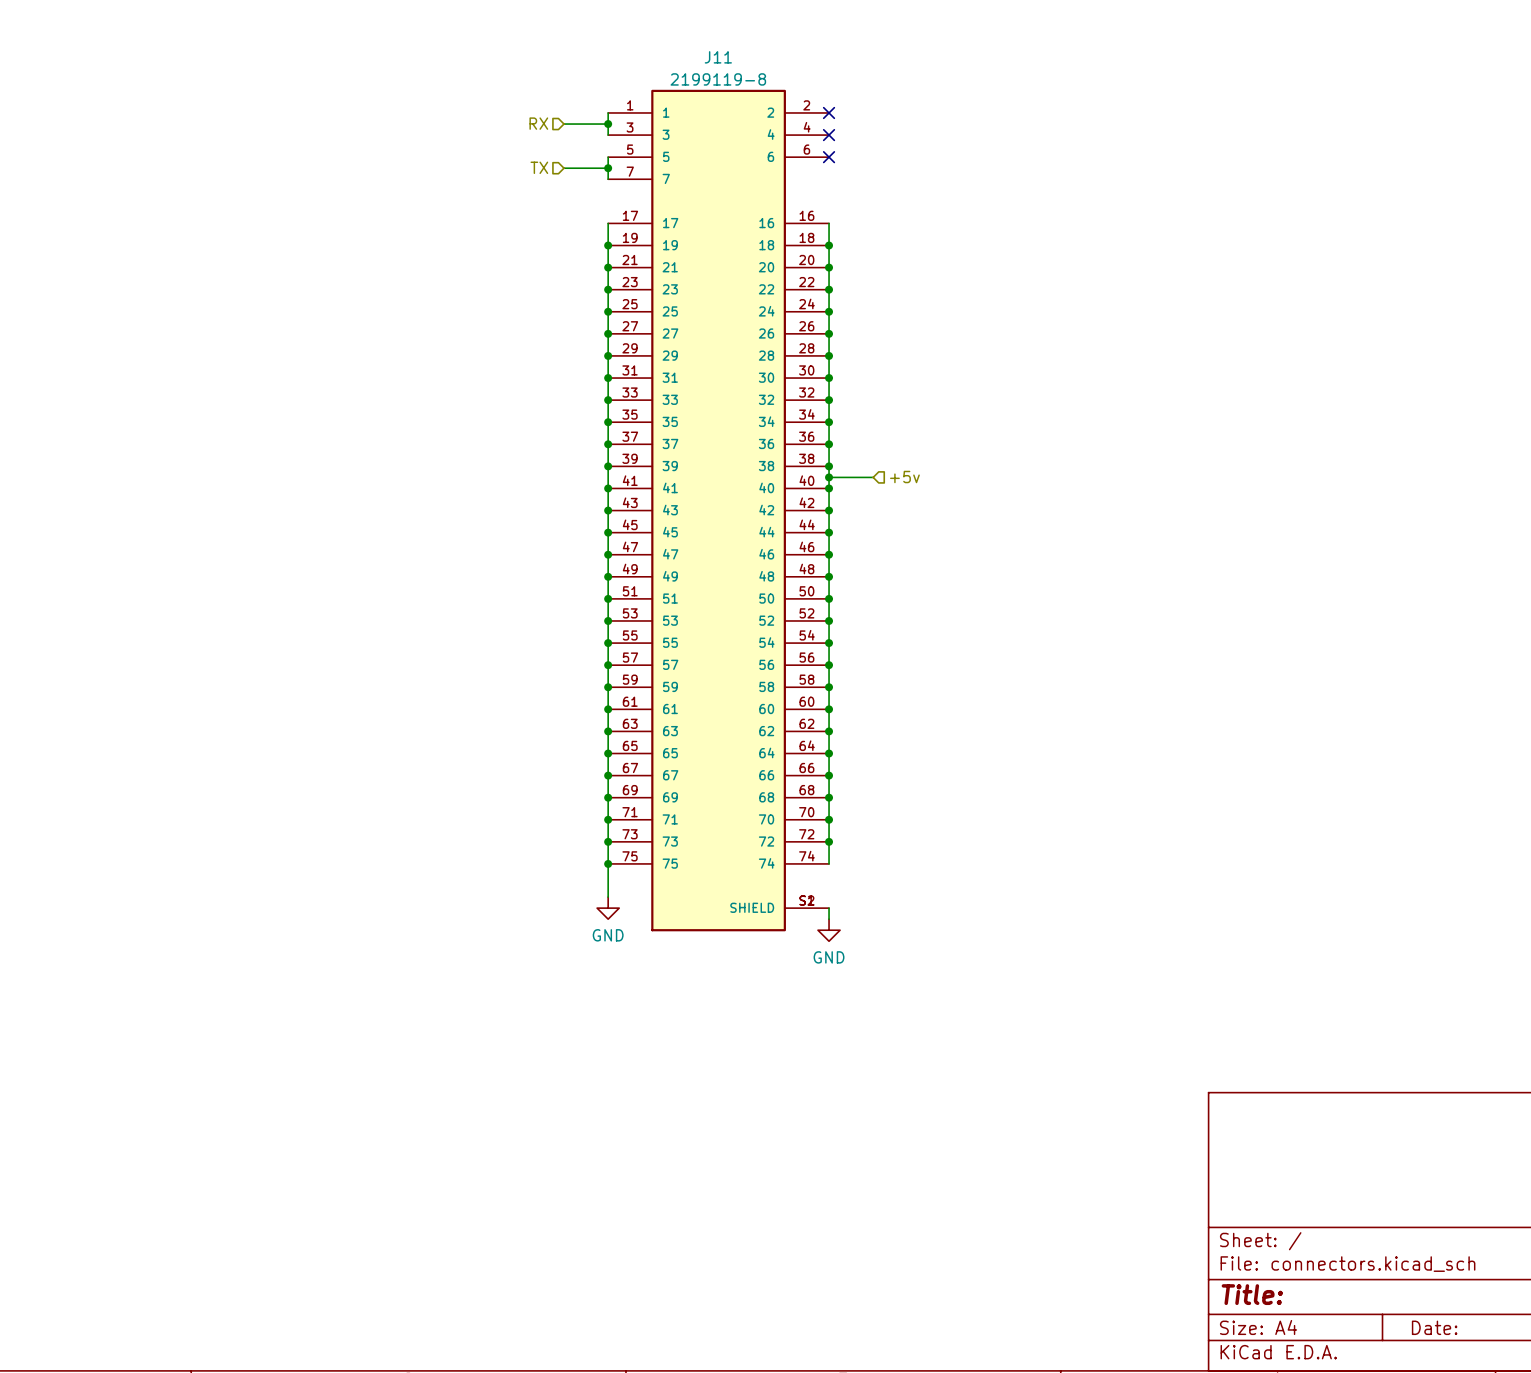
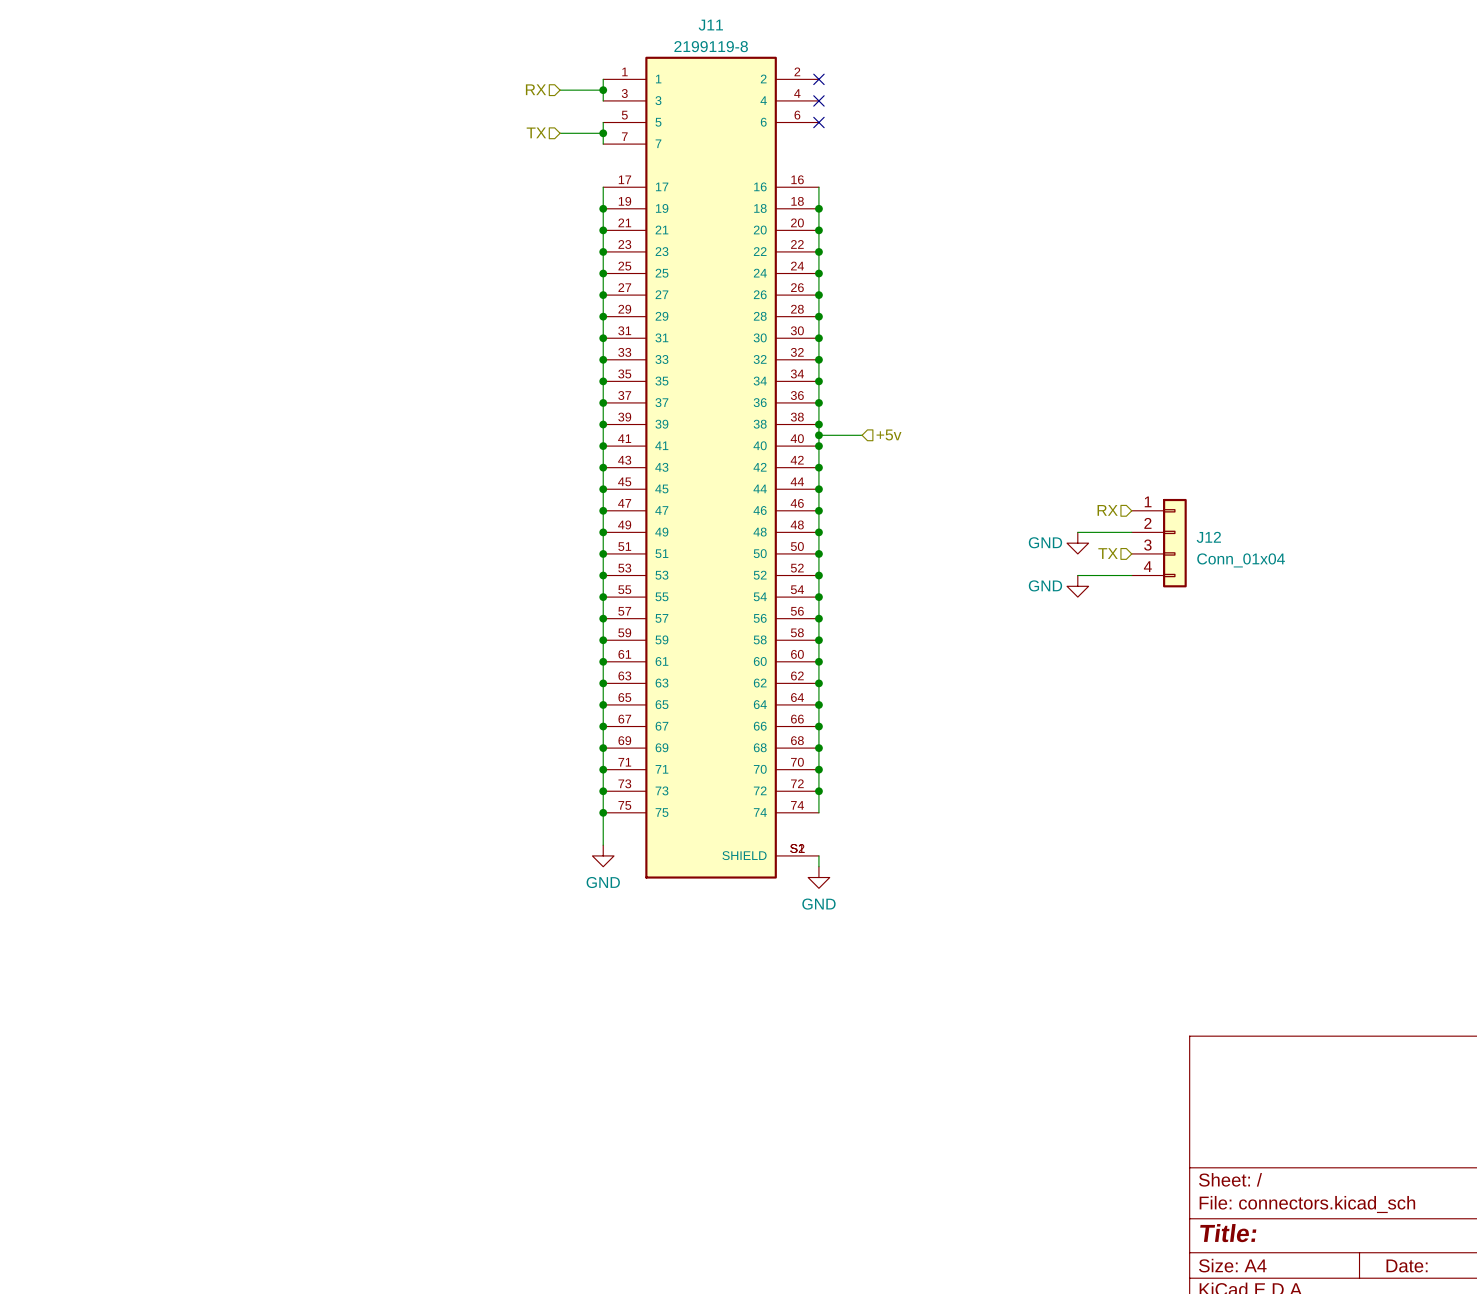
hierarchical label: none -> RX (1107, 510)
wire: none -> (1077, 532) (1131, 532)
power symbol: none -> GND (1077, 543)
J12: none -> Conn_01x04 (1159, 543)
hierarchical label: none -> TX (1108, 553)
wire: none -> (1077, 575) (1131, 575)
power symbol: none -> GND (1077, 586)

